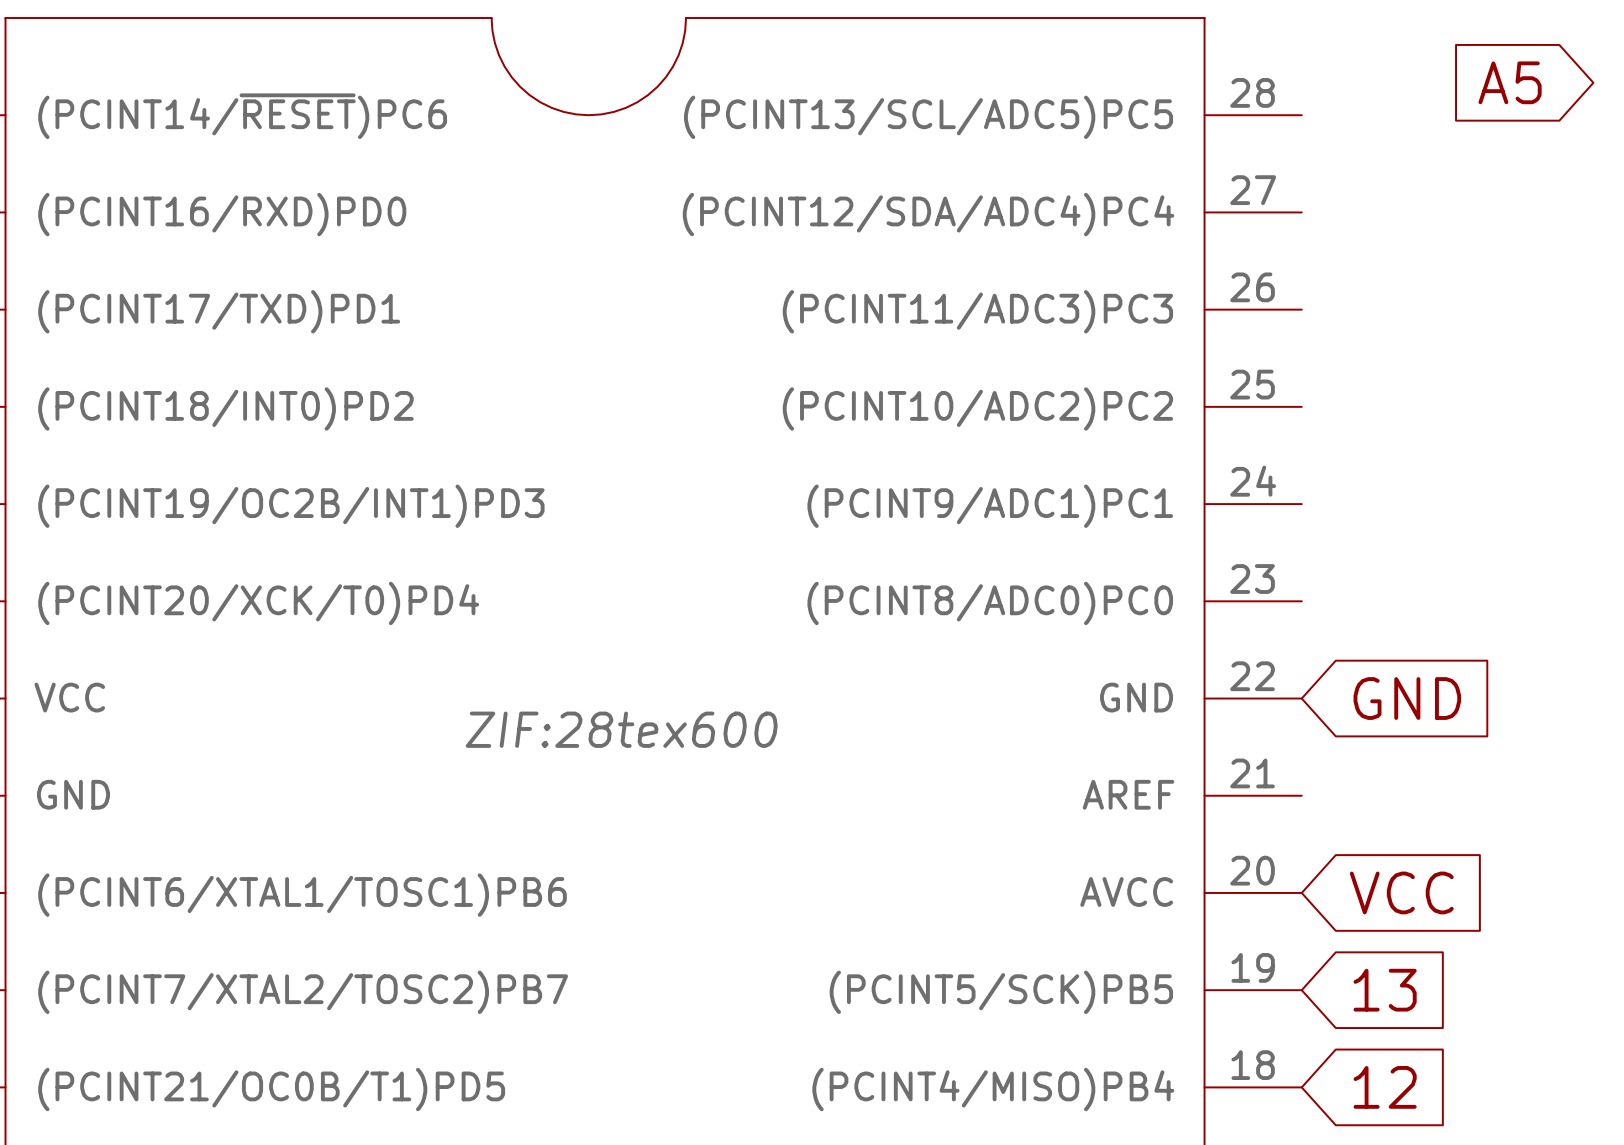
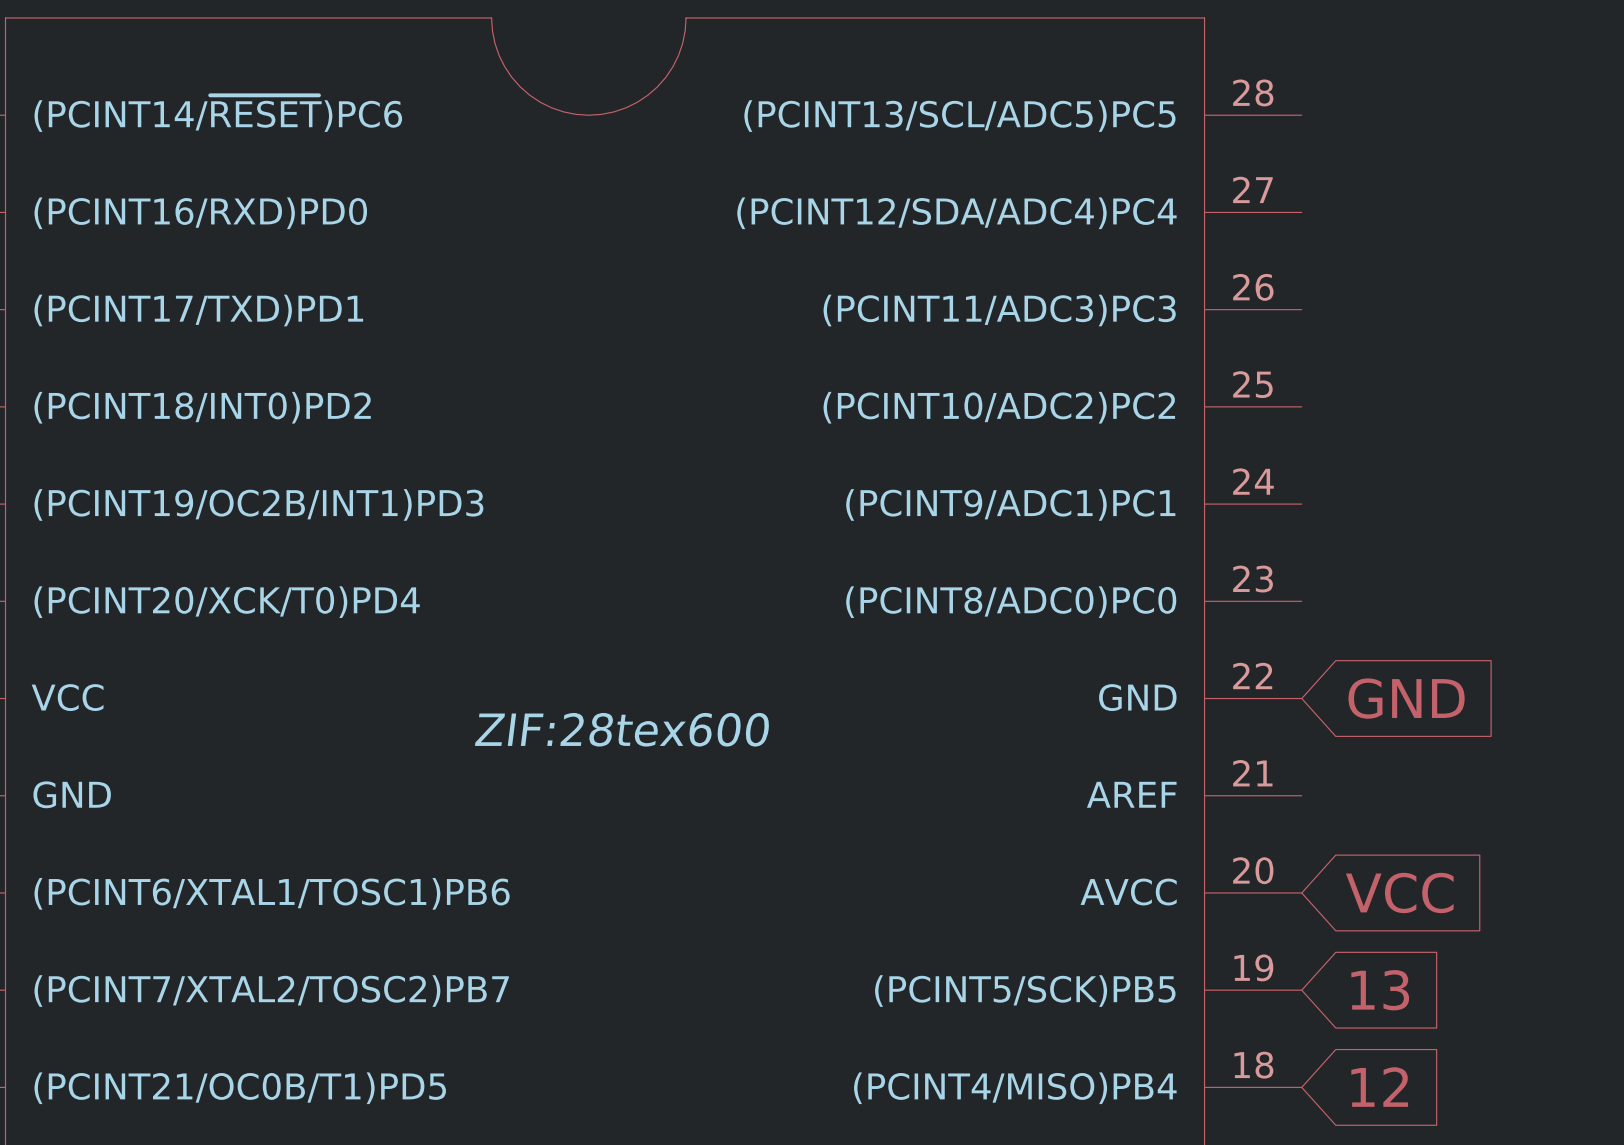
global label: A5 (1510, 82) -> none

